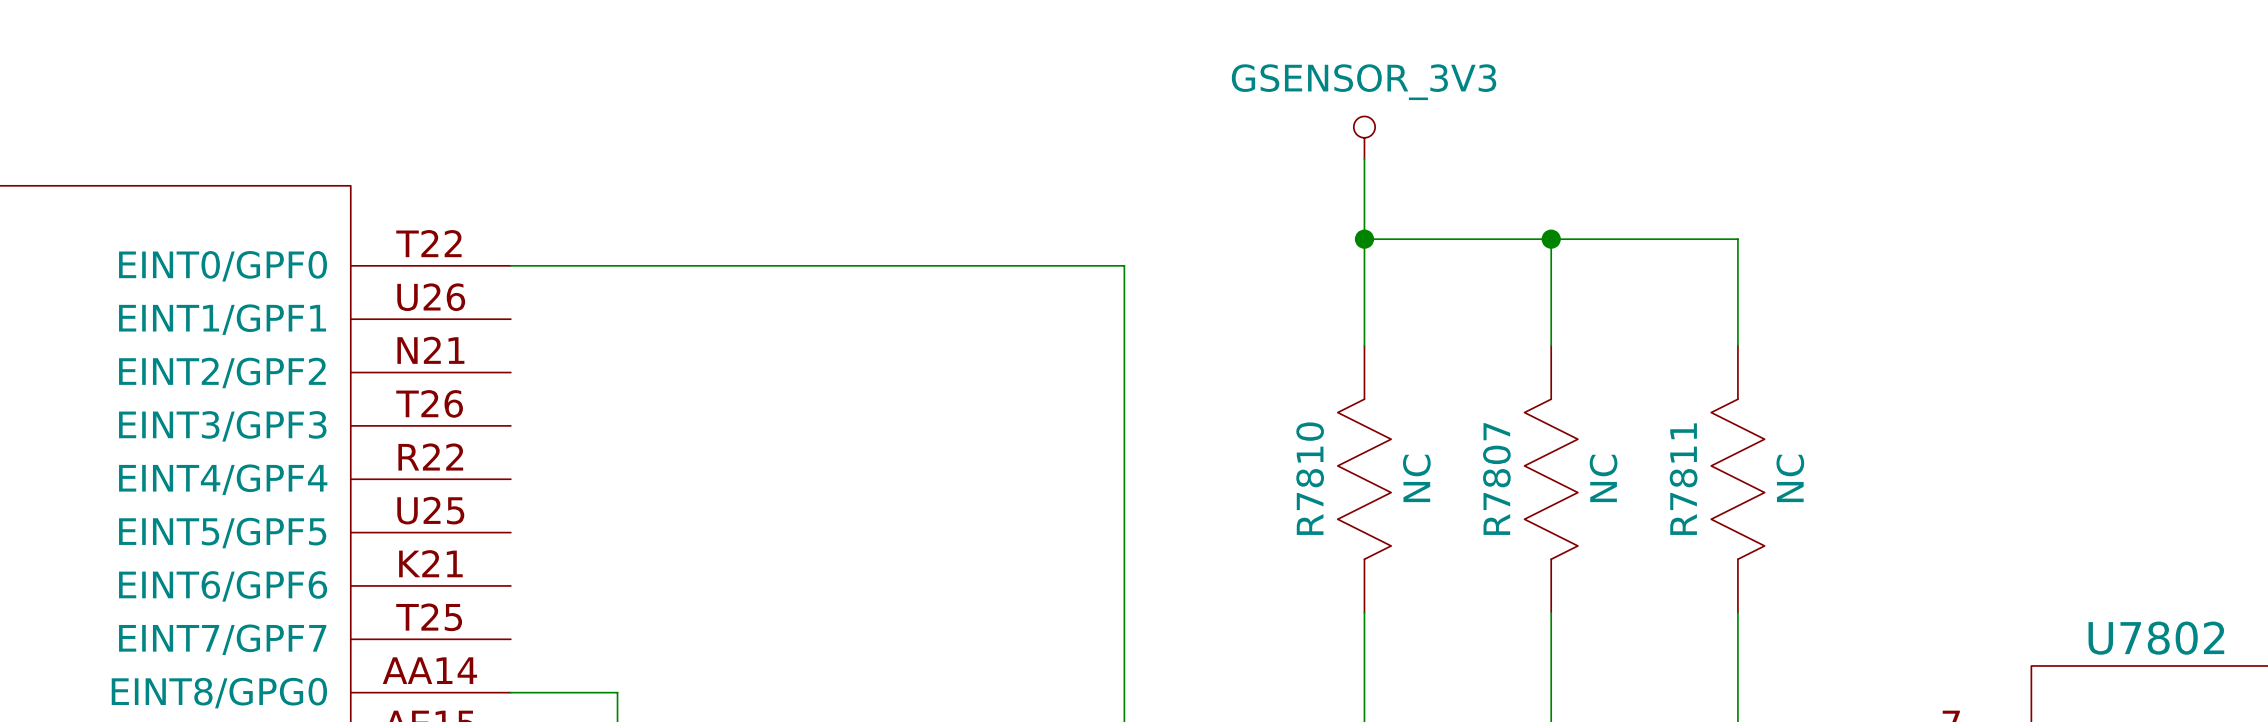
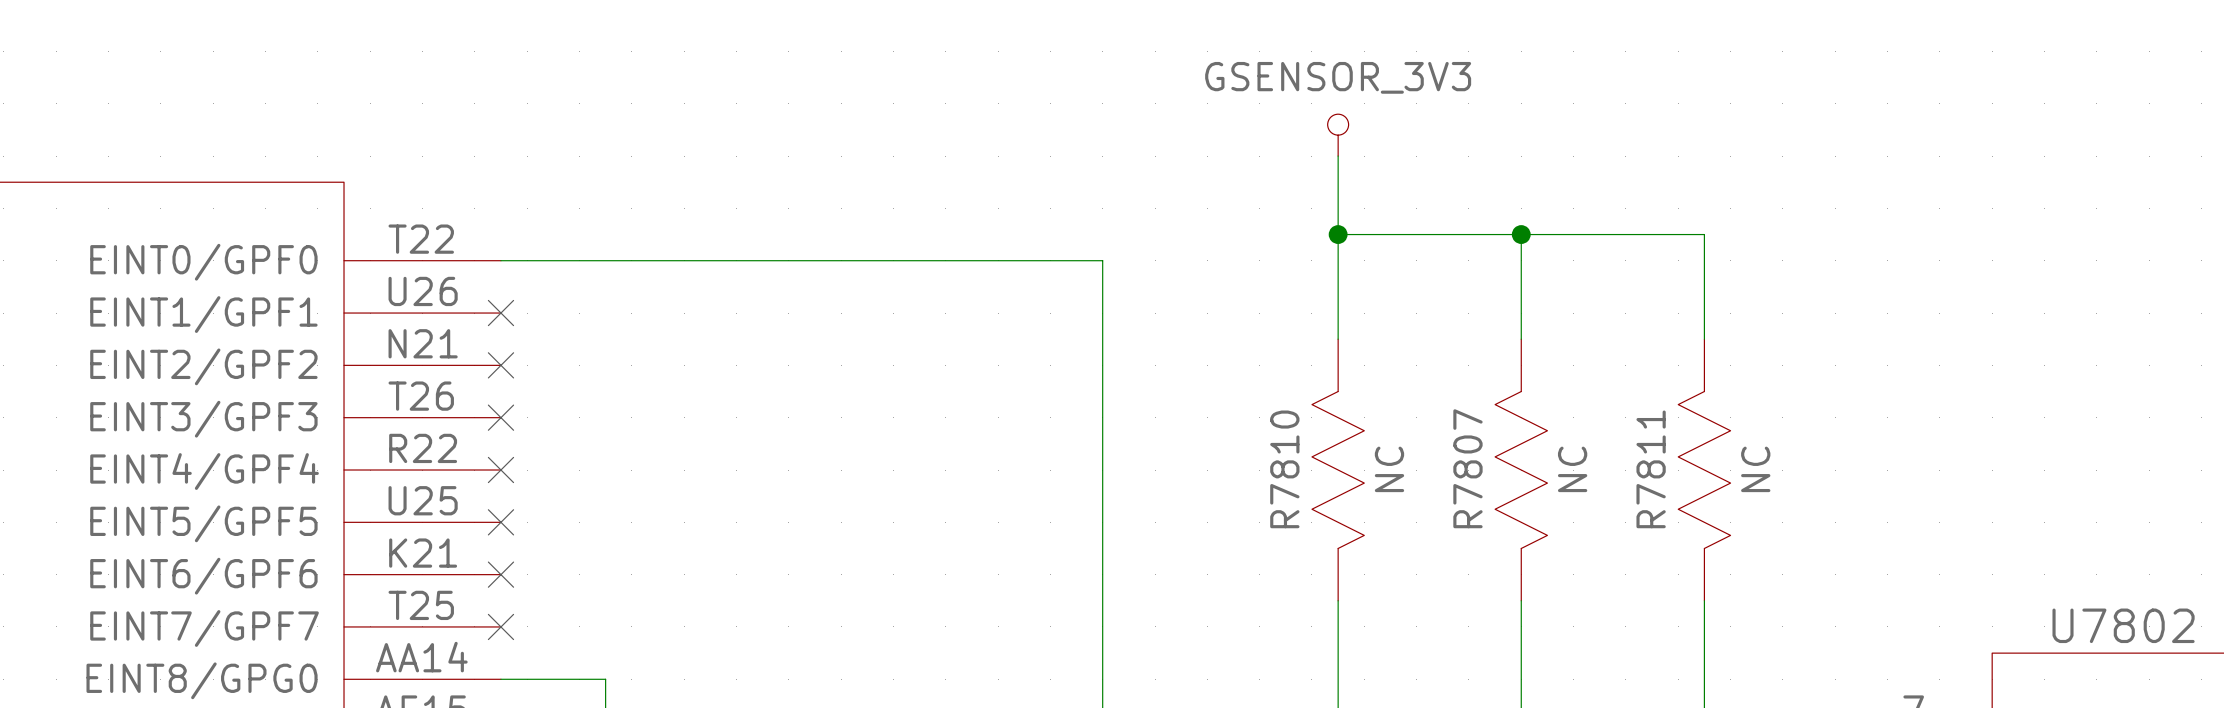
no-connect mark: none -> (500, 313)
no-connect mark: none -> (500, 365)
no-connect mark: none -> (500, 417)
no-connect mark: none -> (500, 470)
no-connect mark: none -> (500, 522)
no-connect mark: none -> (500, 574)
no-connect mark: none -> (500, 626)

